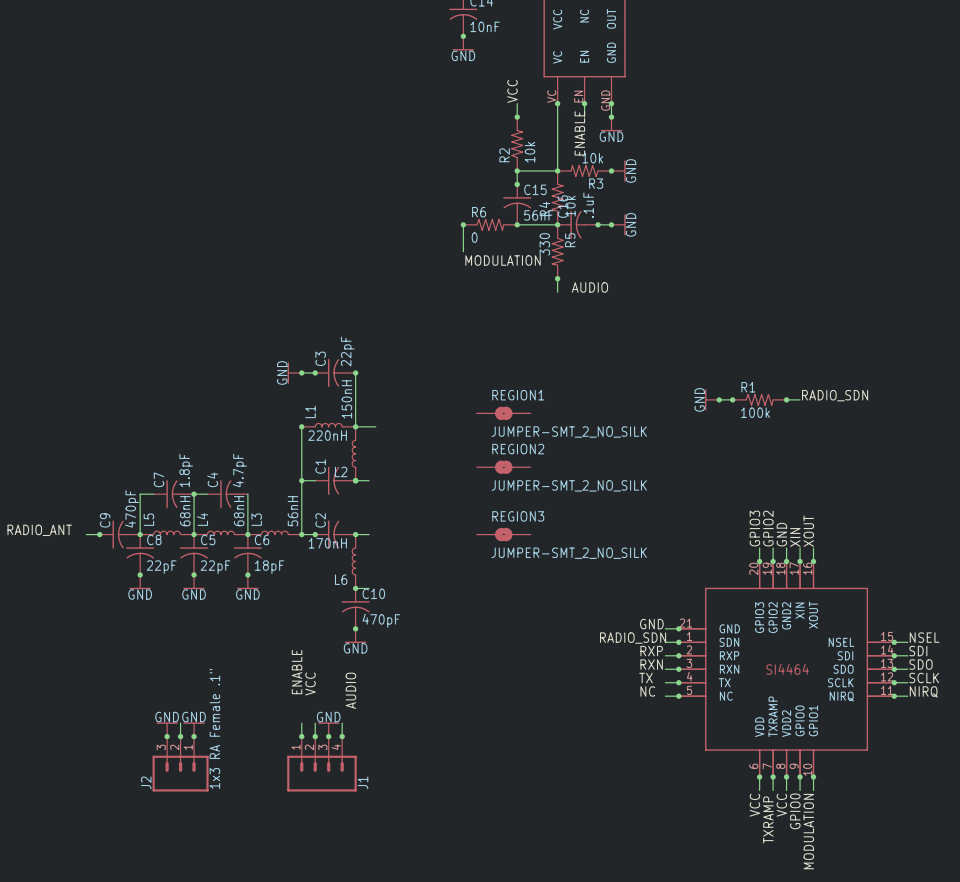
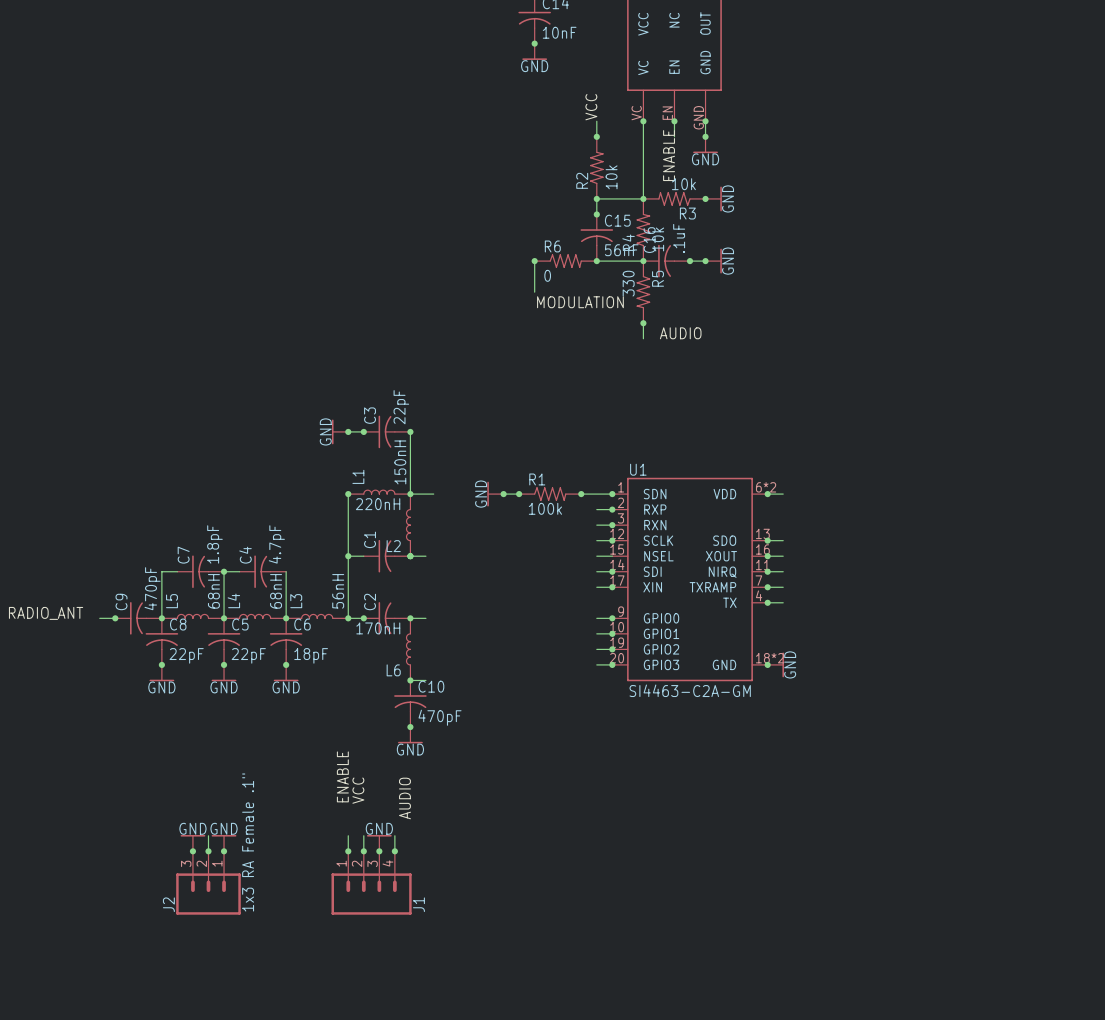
label: RADIO_SDN (835, 395) -> none
power symbol: GND (712, 399) -> none
wire: (719, 399) (732, 399) -> (767, 494) (783, 494)
junction: (719, 399) -> none
junction: (732, 399) -> none
R1 position: (759, 399) -> (550, 494)
wire: (786, 399) (800, 399) -> none
junction: (786, 399) -> none
REGION1: JUMPER-SMT_2_NO_SILK (503, 413) -> none
power symbol: none -> GND (495, 494)
wire: none -> (503, 494) (519, 494)
junction: none -> (503, 494)
junction: none -> (519, 494)
wire: none -> (581, 494) (612, 494)
junction: none -> (581, 494)
junction: none -> (612, 494)
junction: none -> (767, 494)
wire: none -> (596, 509) (612, 509)
junction: none -> (612, 509)
wire: none -> (596, 525) (612, 525)
junction: none -> (612, 525)
REGION2: JUMPER-SMT_2_NO_SILK (503, 467) -> none
junction: none -> (612, 540)
wire: none -> (767, 540) (783, 540)
junction: none -> (767, 540)
wire: none -> (767, 556) (783, 556)
junction: none -> (767, 556)
wire: none -> (596, 571) (612, 571)
junction: none -> (612, 571)
wire: none -> (767, 571) (783, 571)
junction: none -> (767, 571)
U1: none -> SI4463-C2A-GM (690, 579)
wire: none -> (596, 587) (612, 587)
junction: none -> (612, 587)
junction: none -> (767, 587)
junction: none -> (767, 602)
label: GPIO3 (754, 528) -> none
label: GPIO2 (768, 528) -> none
label: XOUT (808, 531) -> none
REGION3: JUMPER-SMT_2_NO_SILK (503, 534) -> none
junction: none -> (612, 618)
label: GND (781, 534) -> none
label: XIN (795, 537) -> none
junction: none -> (612, 633)
wire: (759, 548) (759, 561) -> none
wire: (773, 548) (773, 561) -> none
wire: (786, 548) (786, 561) -> none
wire: (800, 548) (800, 561) -> none
wire: (813, 548) (813, 561) -> none
wire: none -> (596, 649) (612, 649)
junction: none -> (612, 649)
junction: (759, 561) -> none
junction: (773, 561) -> none
junction: (786, 561) -> none
junction: (800, 561) -> none
junction: (813, 561) -> none
wire: none -> (596, 664) (612, 664)
junction: none -> (612, 664)
junction: none -> (767, 664)
power symbol: none -> GND (775, 664)
label: GND (651, 624) -> none
wire: (665, 628) (678, 628) -> (767, 587) (783, 587)
junction: (678, 628) -> none
label: NSEL (924, 637) -> none
label: RADIO_SDN (633, 638) -> none
wire: (665, 642) (678, 642) -> (767, 602) (783, 602)
junction: (678, 642) -> none
wire: (894, 642) (907, 642) -> none
junction: (894, 642) -> none
label: RXP (651, 651) -> none
label: SDI (918, 651) -> none
wire: (665, 655) (678, 655) -> none
junction: (678, 655) -> none
wire: (894, 655) (907, 655) -> none
junction: (894, 655) -> none
label: RXN (651, 664) -> none
label: SDO (920, 664) -> none
wire: (665, 669) (678, 669) -> none
junction: (678, 669) -> none
part: (786, 669) -> none
wire: (894, 669) (907, 669) -> none
junction: (894, 669) -> none
label: TX (646, 678) -> none
label: SCLK (924, 678) -> none
wire: (665, 682) (678, 682) -> none
junction: (678, 682) -> none
wire: (894, 682) (907, 682) -> none
junction: (894, 682) -> none
label: NC (647, 691) -> none
label: NIRQ (923, 691) -> none
wire: (665, 696) (678, 696) -> none
junction: (678, 696) -> none
wire: (894, 696) (907, 696) -> none
junction: (894, 696) -> none
wire: (759, 776) (759, 790) -> none
junction: (759, 776) -> none
wire: (773, 776) (773, 790) -> none
junction: (773, 776) -> none
wire: (786, 776) (786, 790) -> none
junction: (786, 776) -> none
wire: (800, 776) (800, 790) -> none
junction: (800, 776) -> none
wire: (813, 776) (813, 790) -> none
junction: (813, 776) -> none
label: VCC (754, 805) -> none
label: VCC (781, 805) -> none
label: GPIO0 (795, 811) -> none
label: TXRAMP (768, 819) -> none
label: MODULATION (808, 831) -> none

